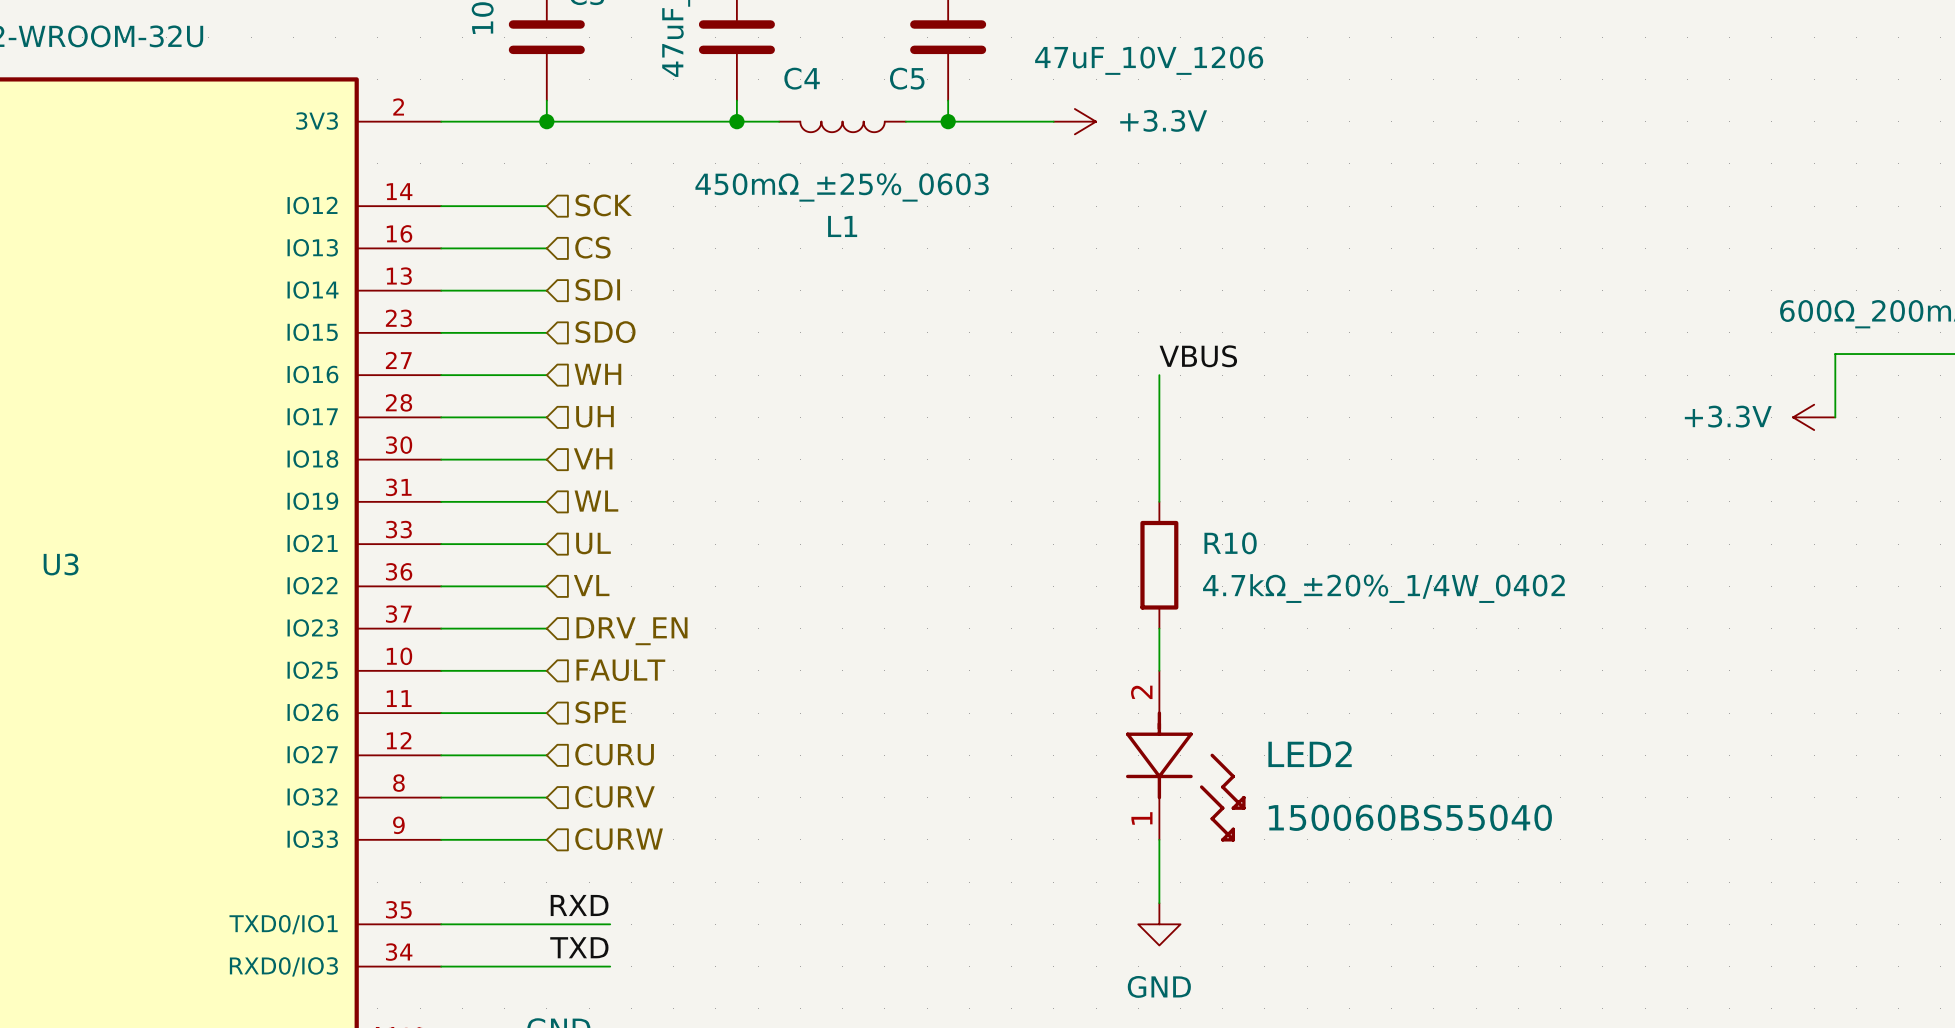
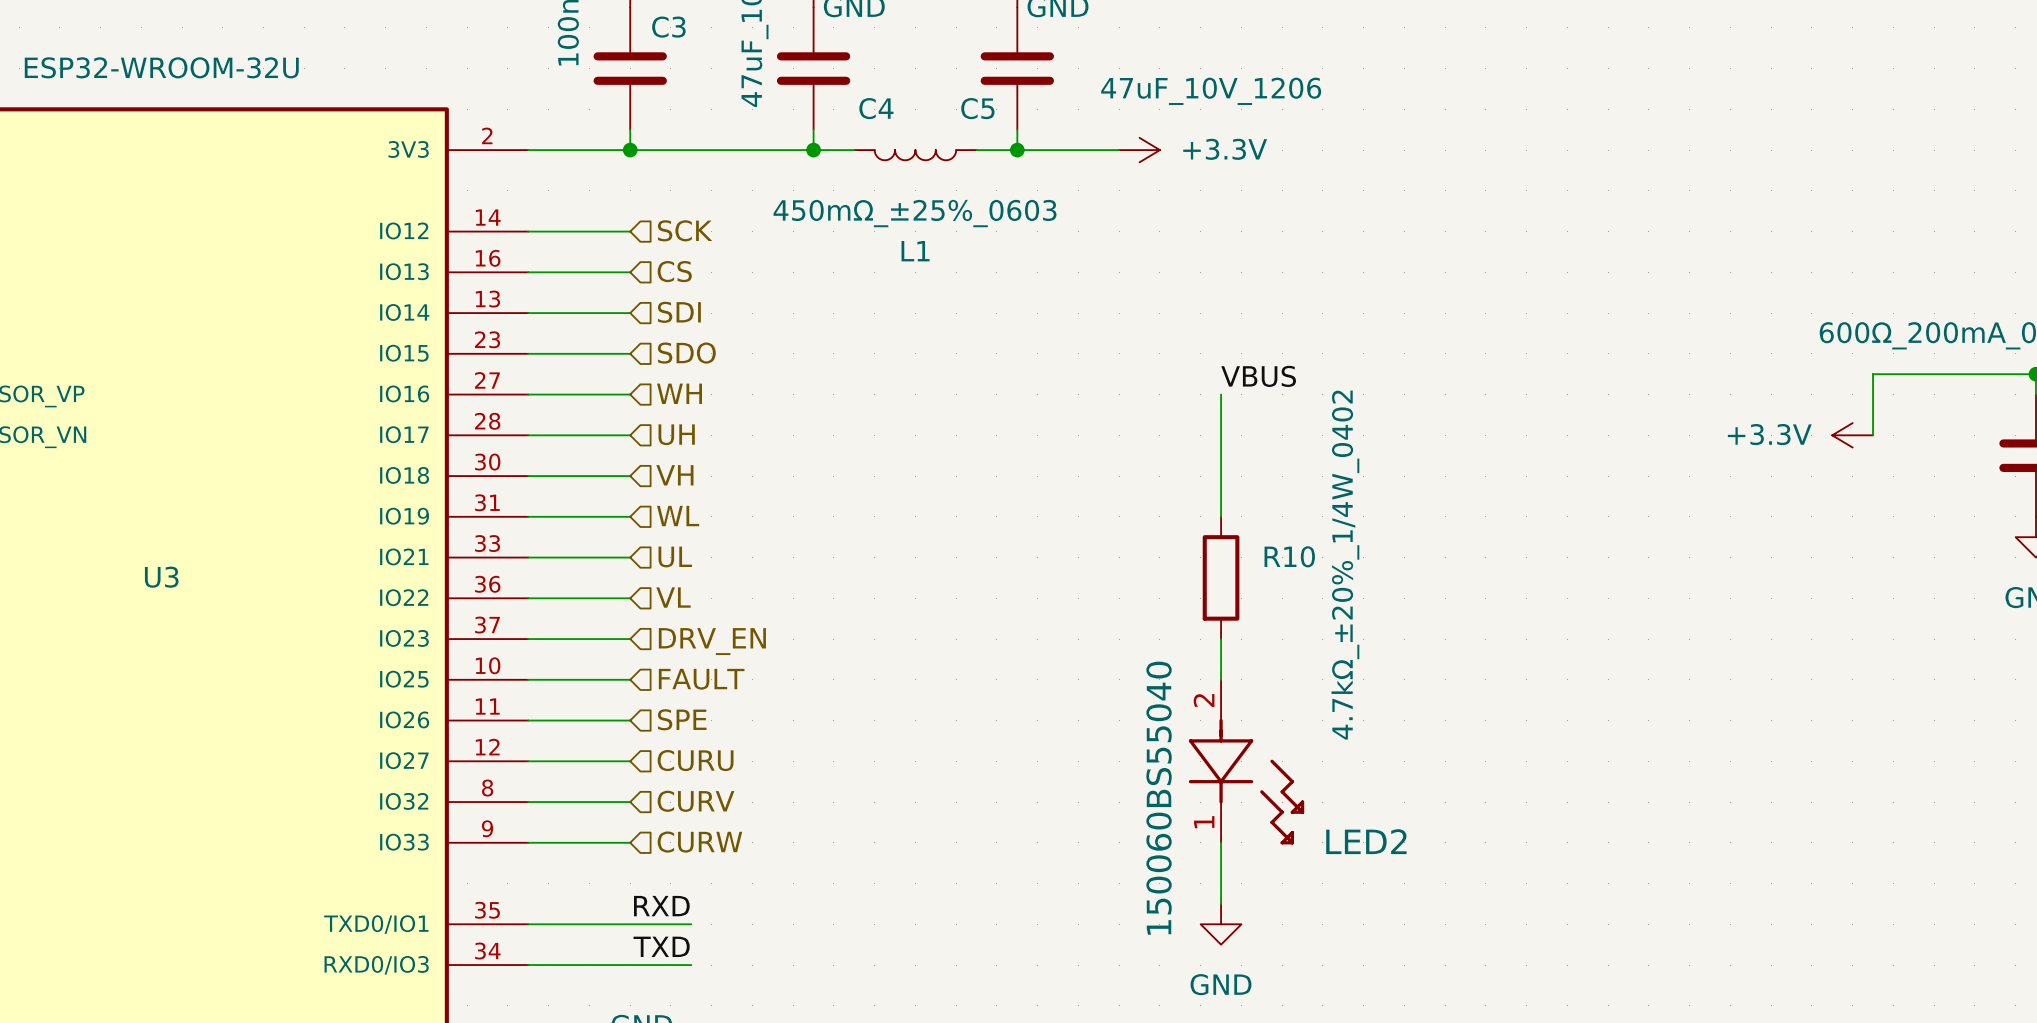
R10 value rotation: 0° (1383, 588) -> 90° counterclockwise (1345, 565)
LED2 name position: LED2 (1310, 754) -> LED2 (1366, 841)
LED2 value rotation: 0° (1410, 817) -> 90° counterclockwise (1159, 798)

